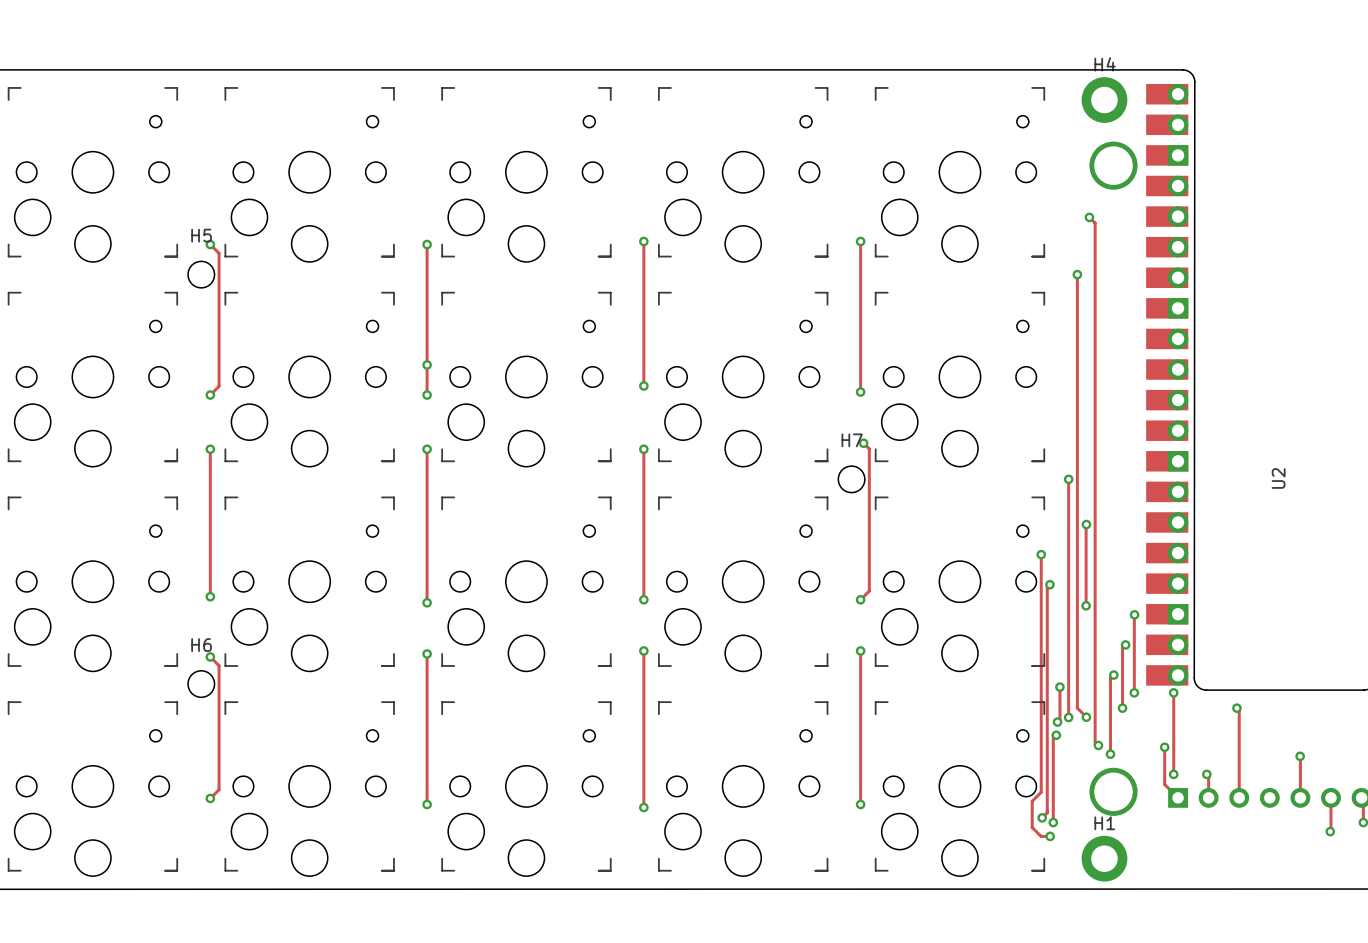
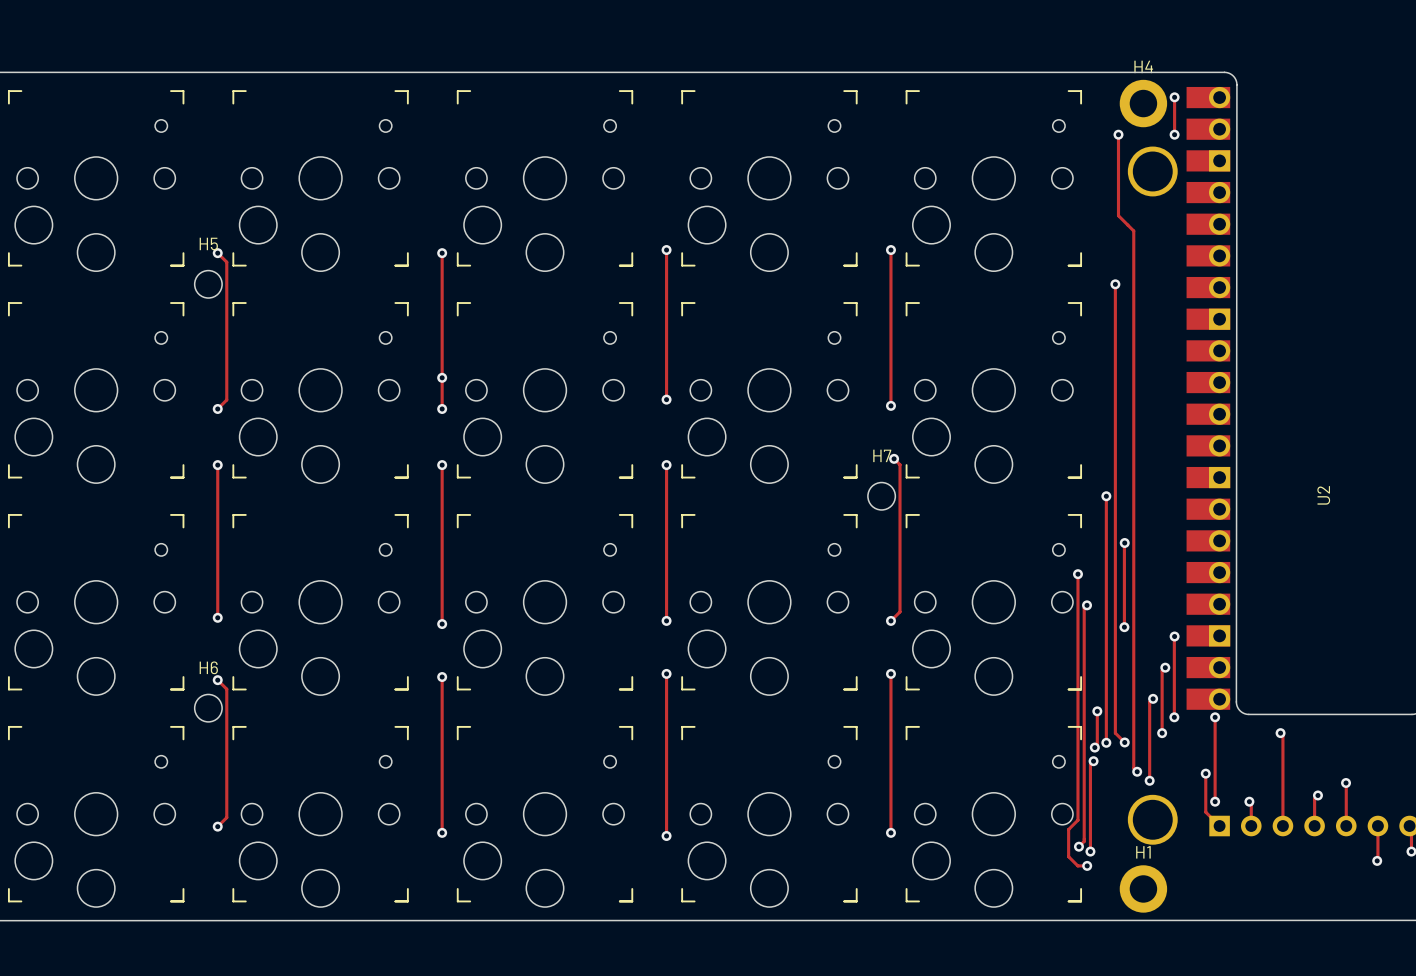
track: none -> (1174, 97) (1174, 134)
via: none -> (1174, 97)
track: none -> (1118, 134) (1118, 215) (1127, 225)
via: none -> (1118, 134)
via: none -> (1174, 134)
via: (1089, 217) -> none
track: none -> (1317, 795) (1314, 798) (1314, 826)
via: none -> (1317, 795)

